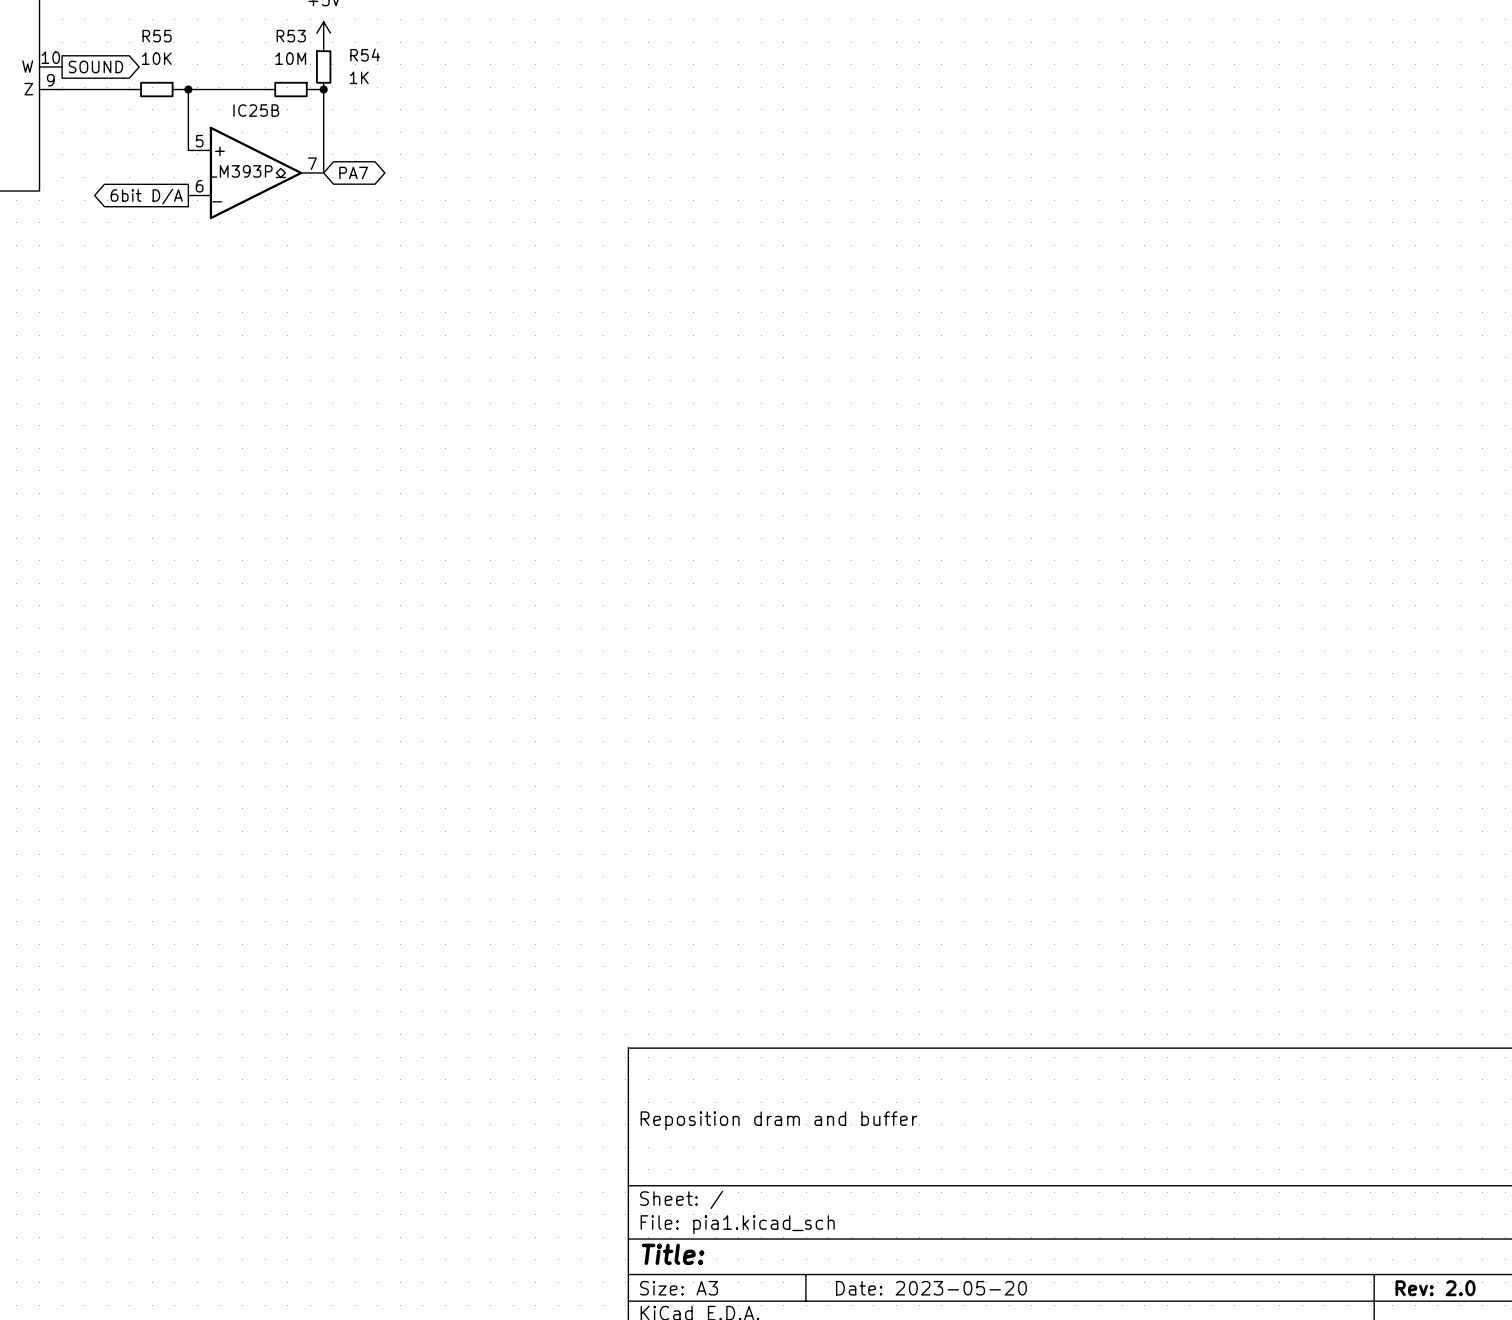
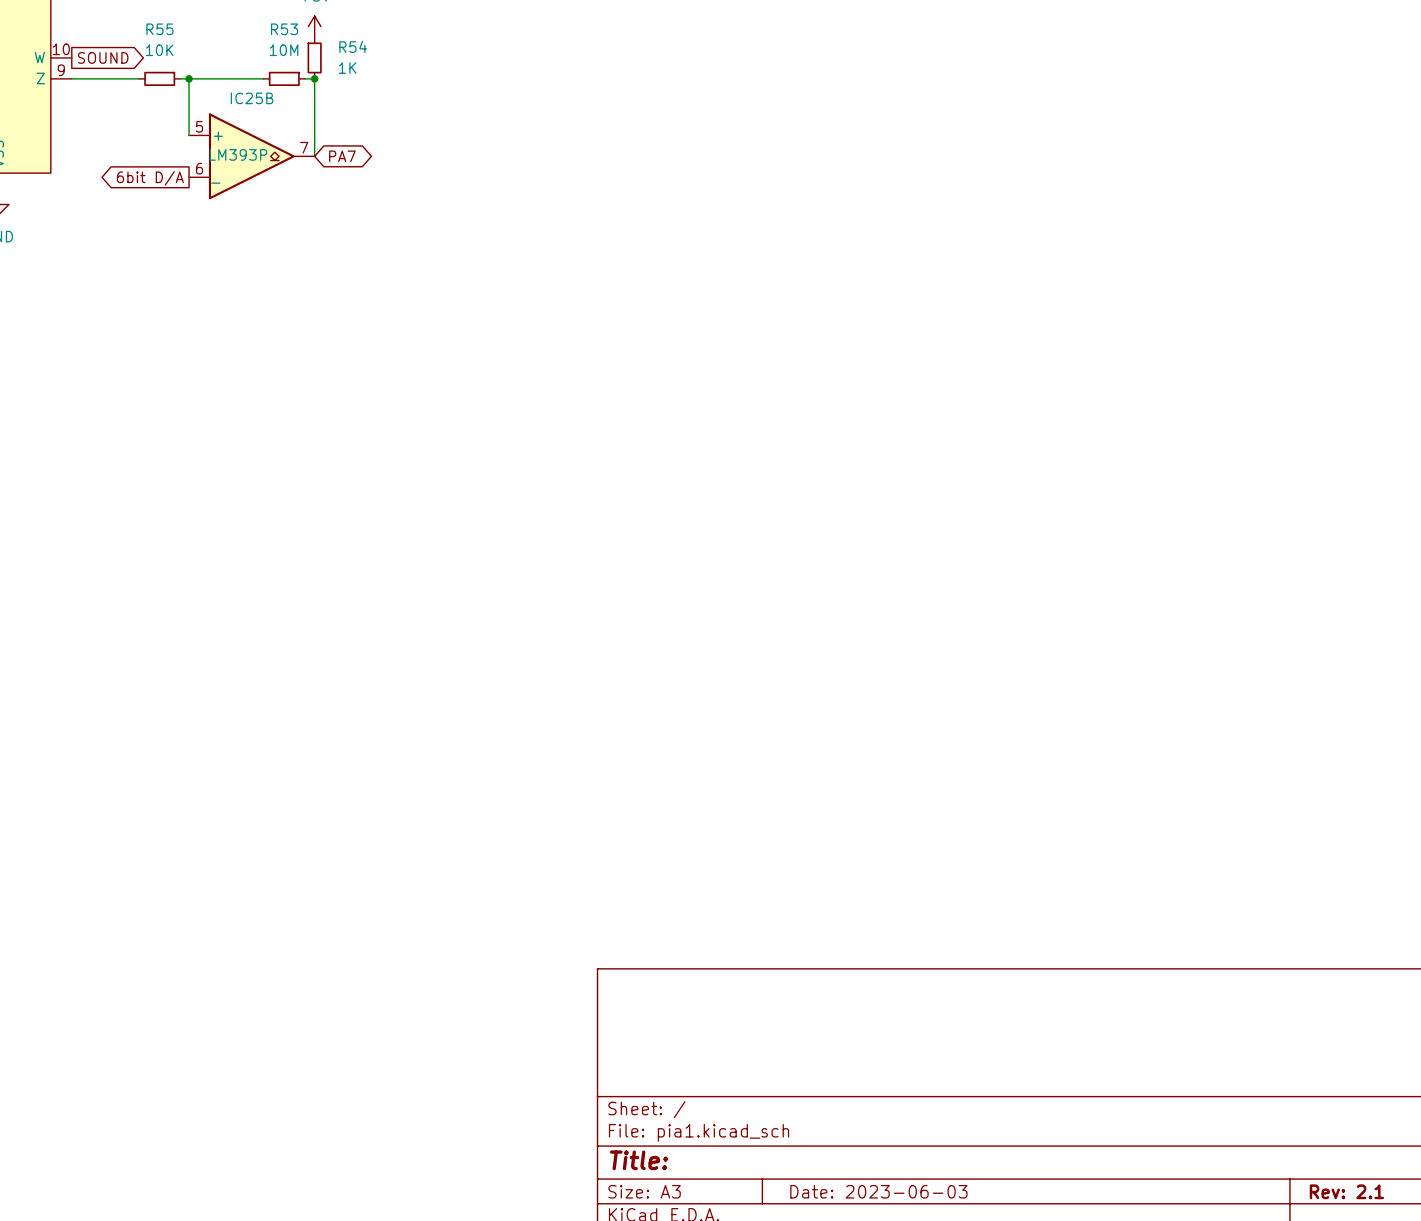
title block: Reposition dram and buffer (778, 1120) -> none
title block: Date: 2023-05-20 (931, 1288) -> Date: 2023-06-03 (878, 1191)
title block: Rev: 2.0 (1435, 1288) -> Rev: 2.1 (1346, 1191)

